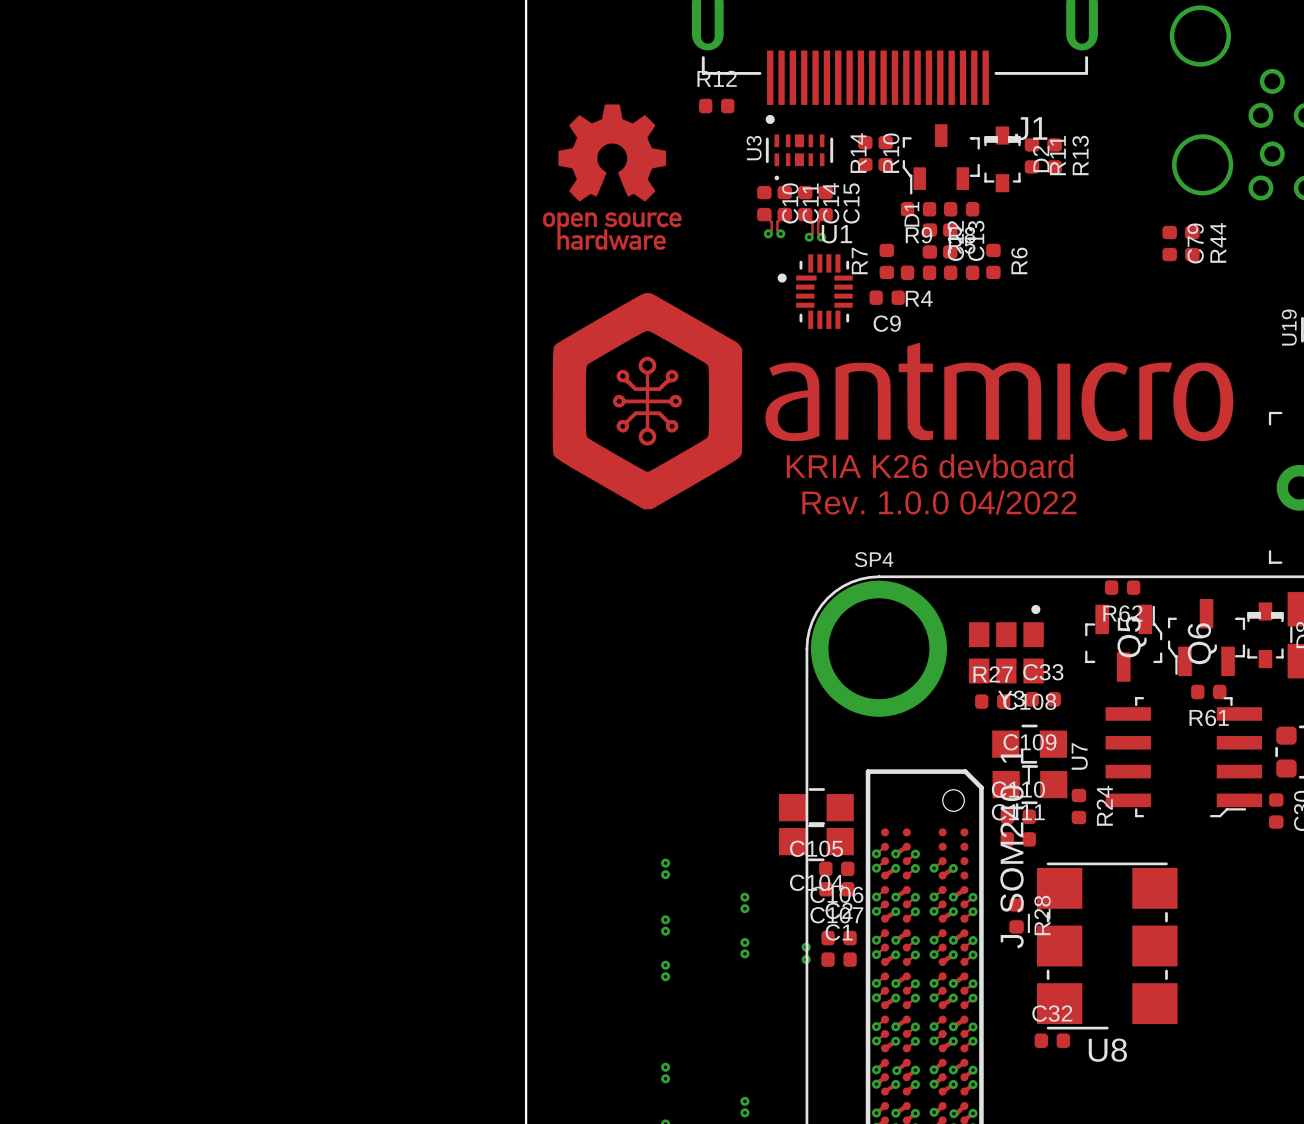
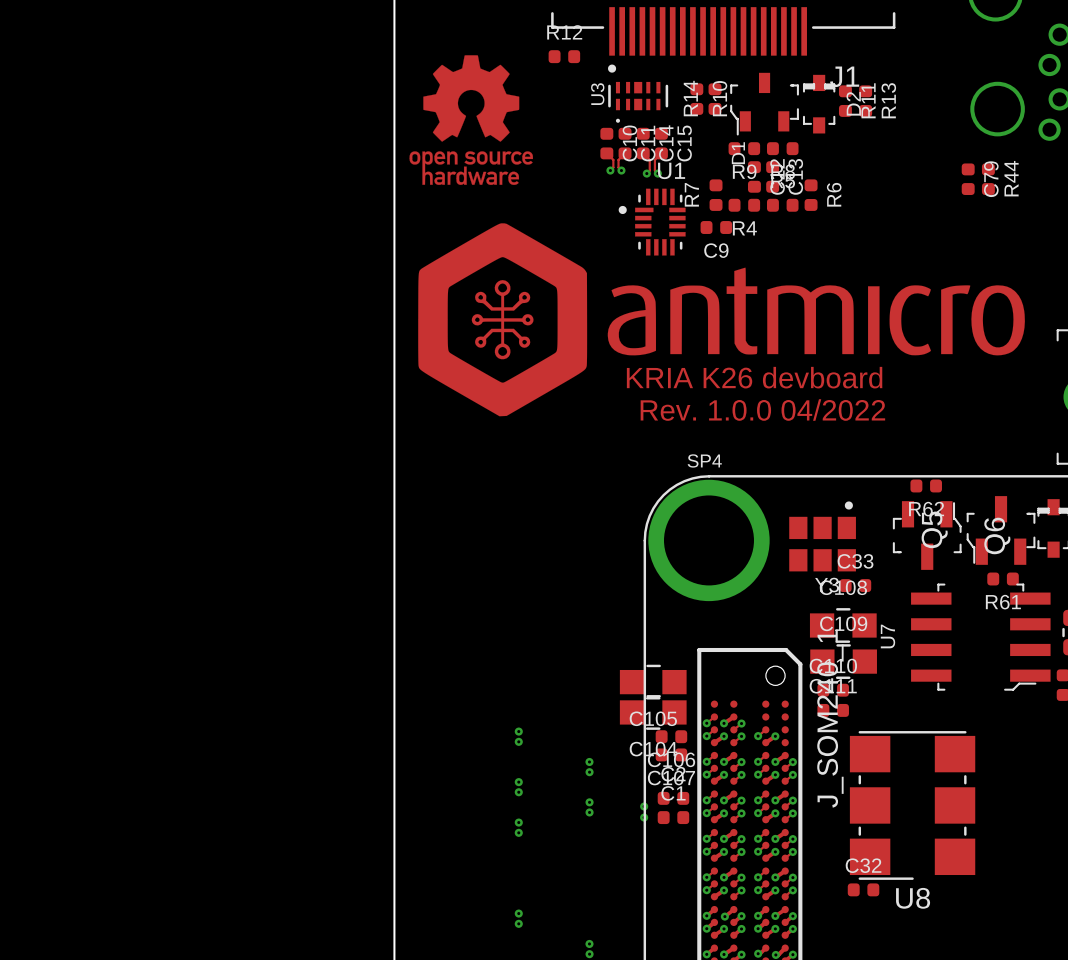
R27: (992, 701) -> none
R24: (1078, 806) -> none
R28: (1016, 915) -> none

